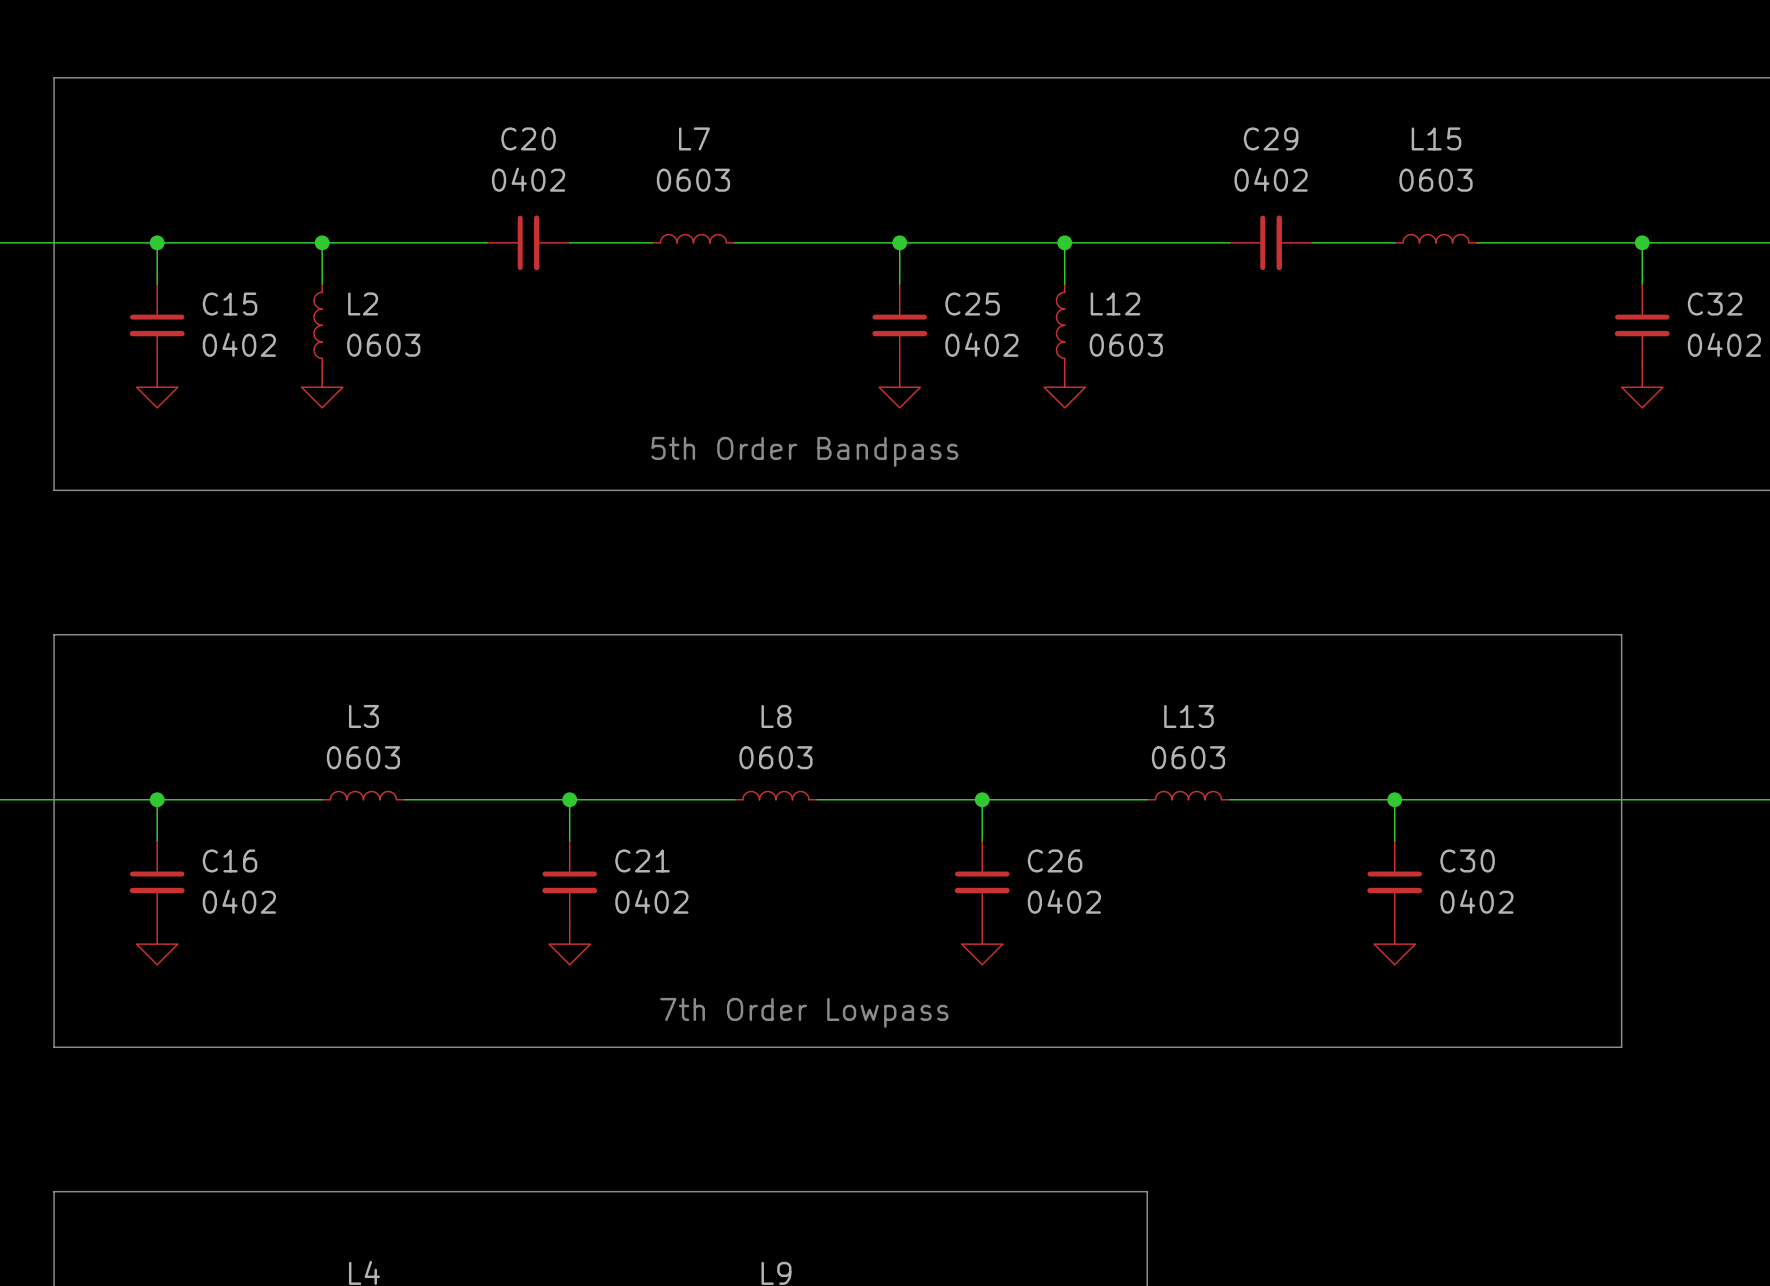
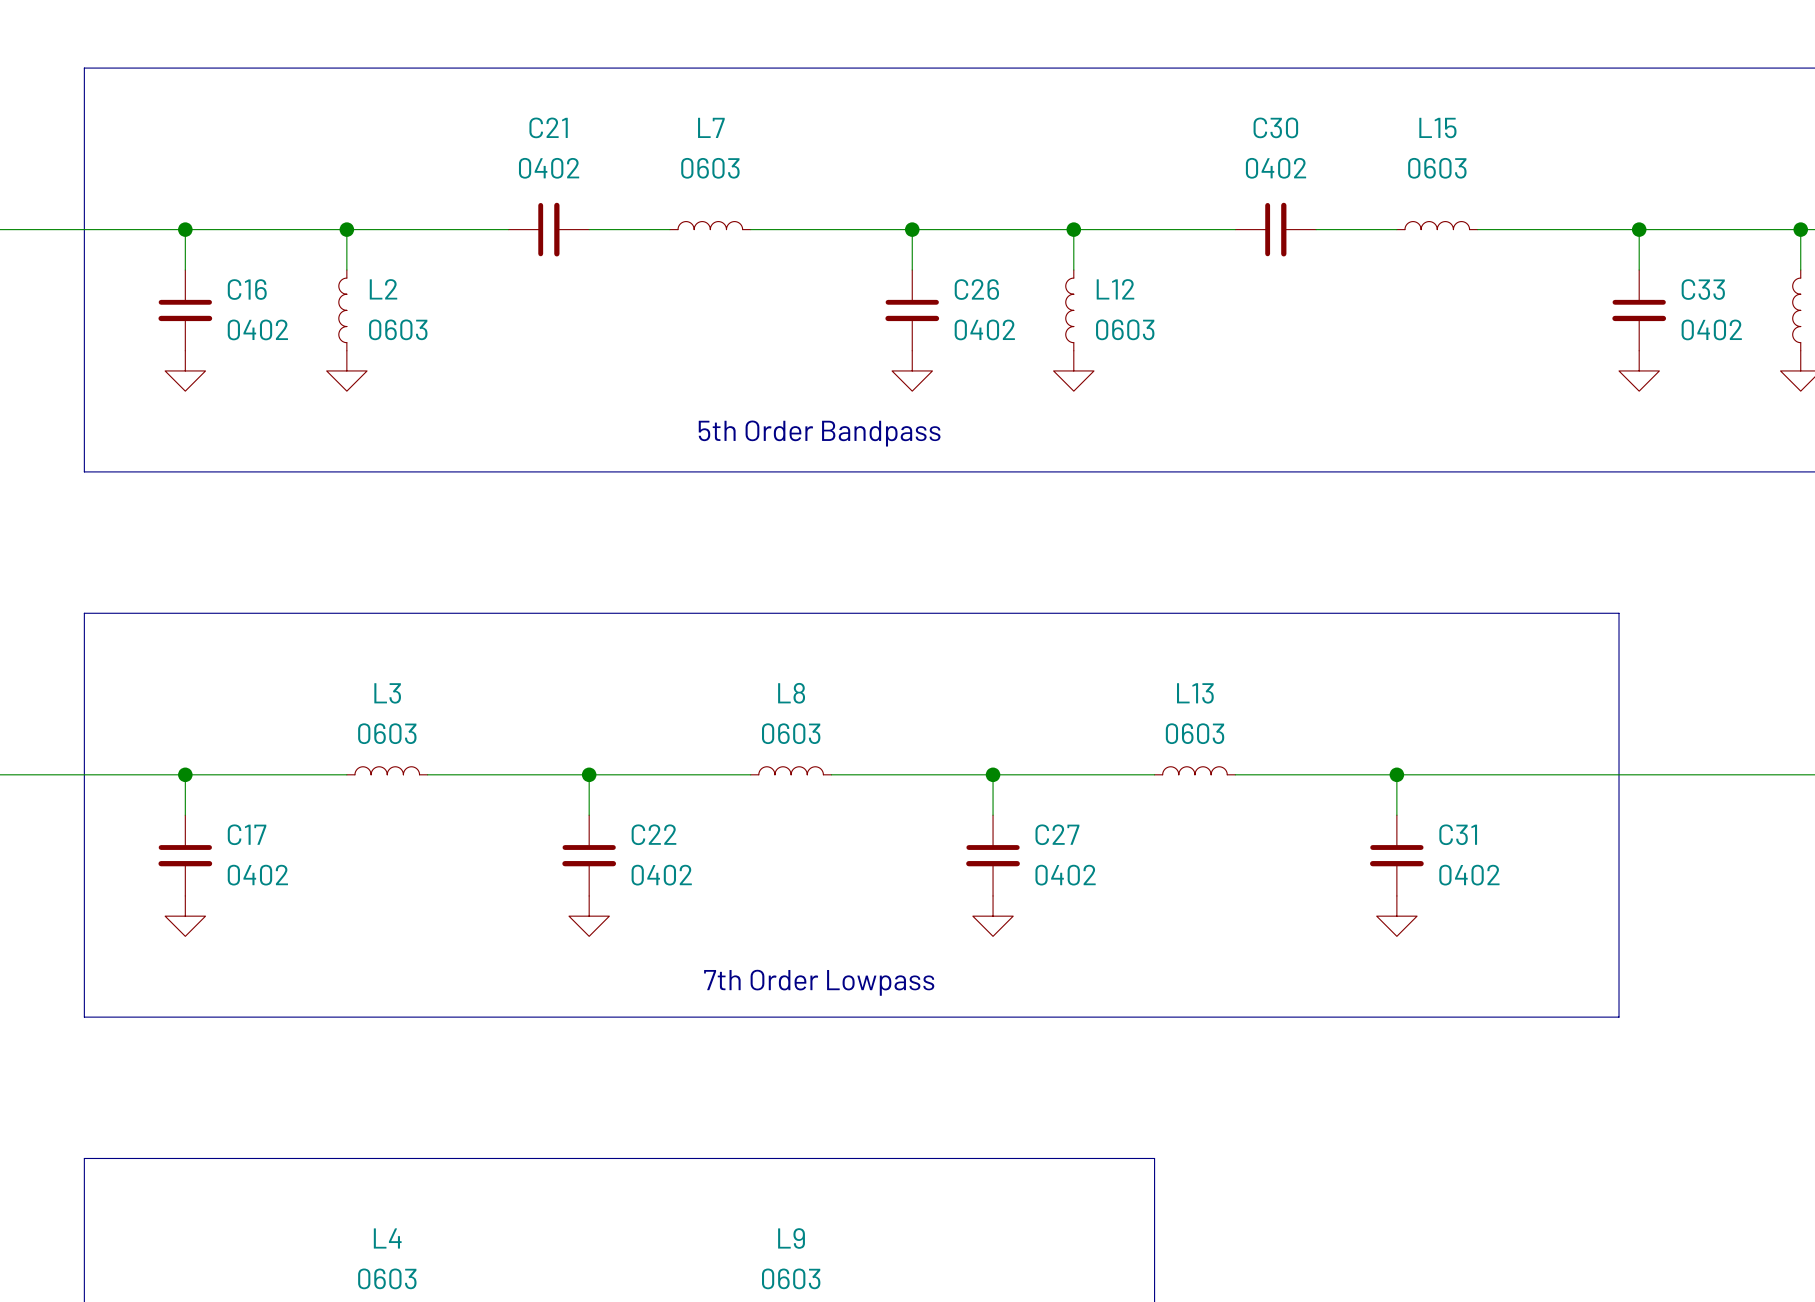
C20 name: C20 (528, 138) -> C21 (548, 127)
C29 name: C29 (1271, 138) -> C30 (1275, 127)
C15 name: C15 (230, 304) -> C16 (247, 289)
C25 name: C25 (972, 304) -> C26 (976, 289)
C32 name: C32 (1715, 304) -> C33 (1703, 289)
C16 name: C16 (230, 860) -> C17 (247, 834)
C21 name: C21 (642, 860) -> C22 (653, 834)
C26 name: C26 (1055, 860) -> C27 (1057, 834)
C30 name: C30 (1467, 860) -> C31 (1458, 834)

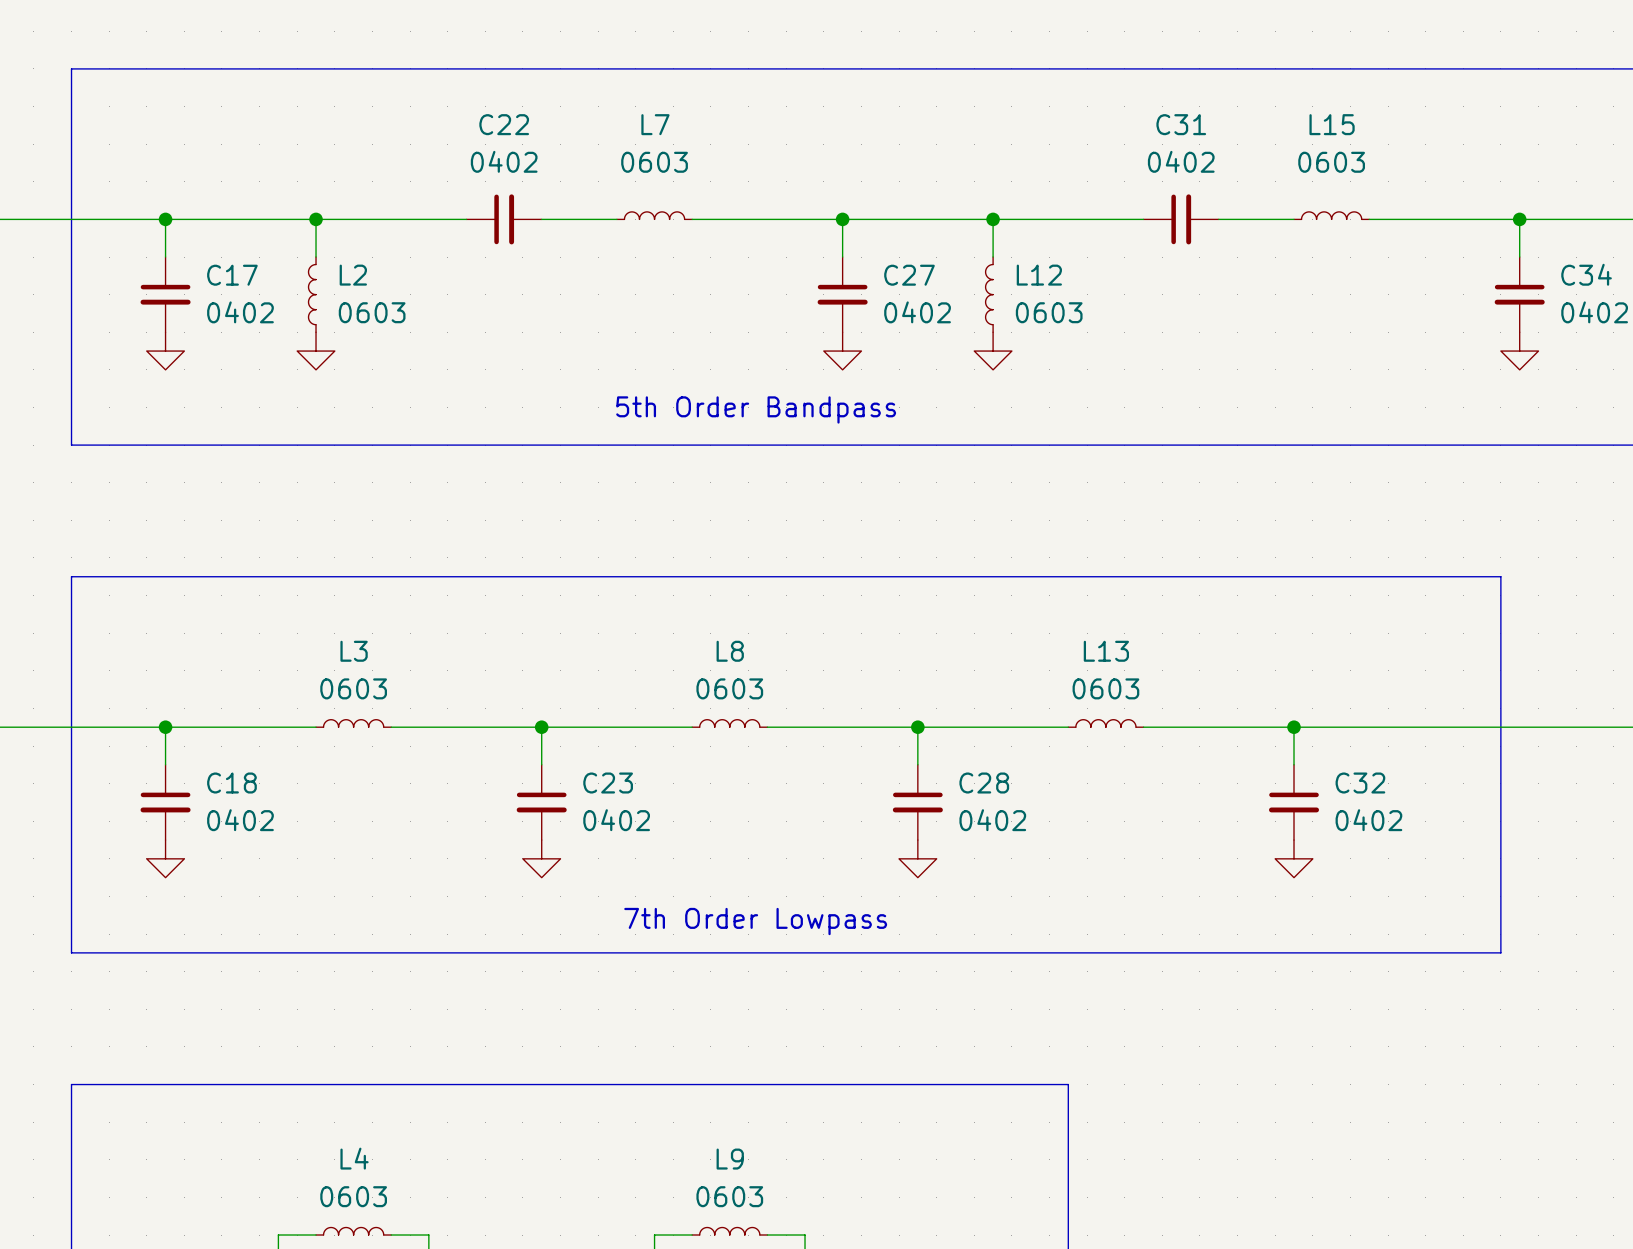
C21 name: C21 (548, 127) -> C22 (504, 124)
C30 name: C30 (1275, 127) -> C31 (1181, 124)
C16 name: C16 (247, 289) -> C17 (232, 275)
C26 name: C26 (976, 289) -> C27 (909, 275)
C33 name: C33 (1703, 289) -> C34 (1586, 274)
C17 name: C17 (247, 834) -> C18 (231, 783)
C22 name: C22 (653, 834) -> C23 (608, 783)
C27 name: C27 (1057, 834) -> C28 (984, 783)
C31 name: C31 (1458, 834) -> C32 (1360, 783)

